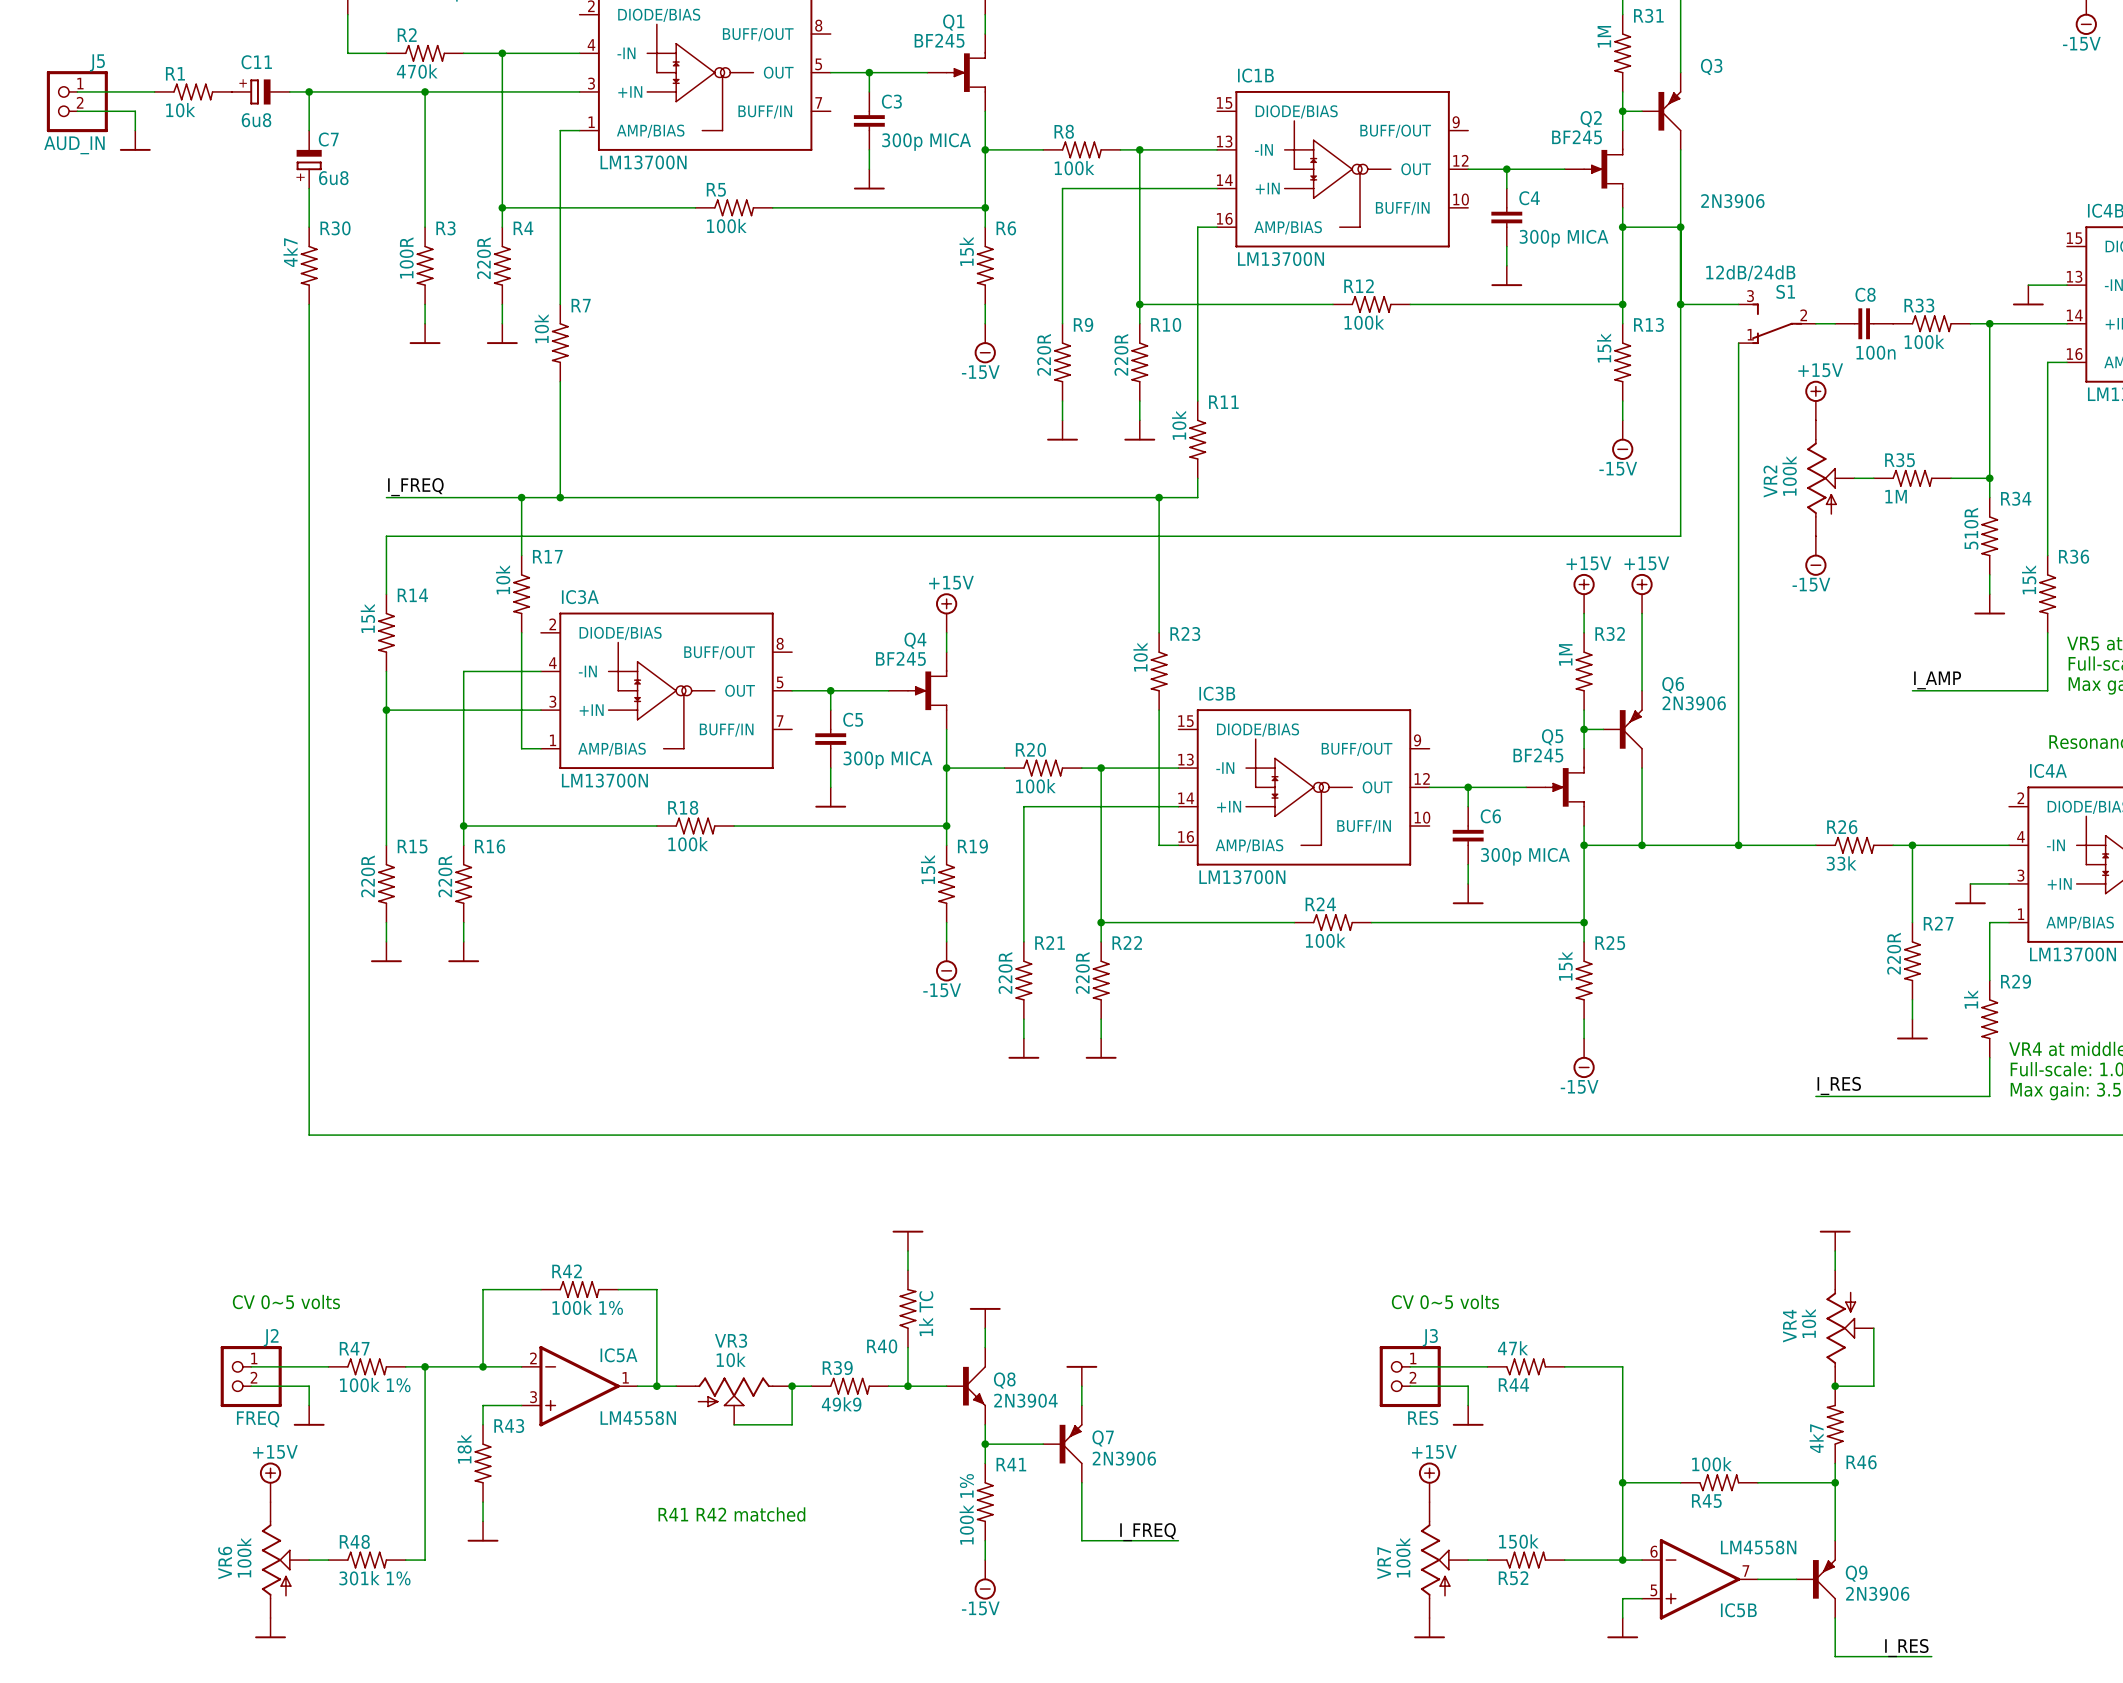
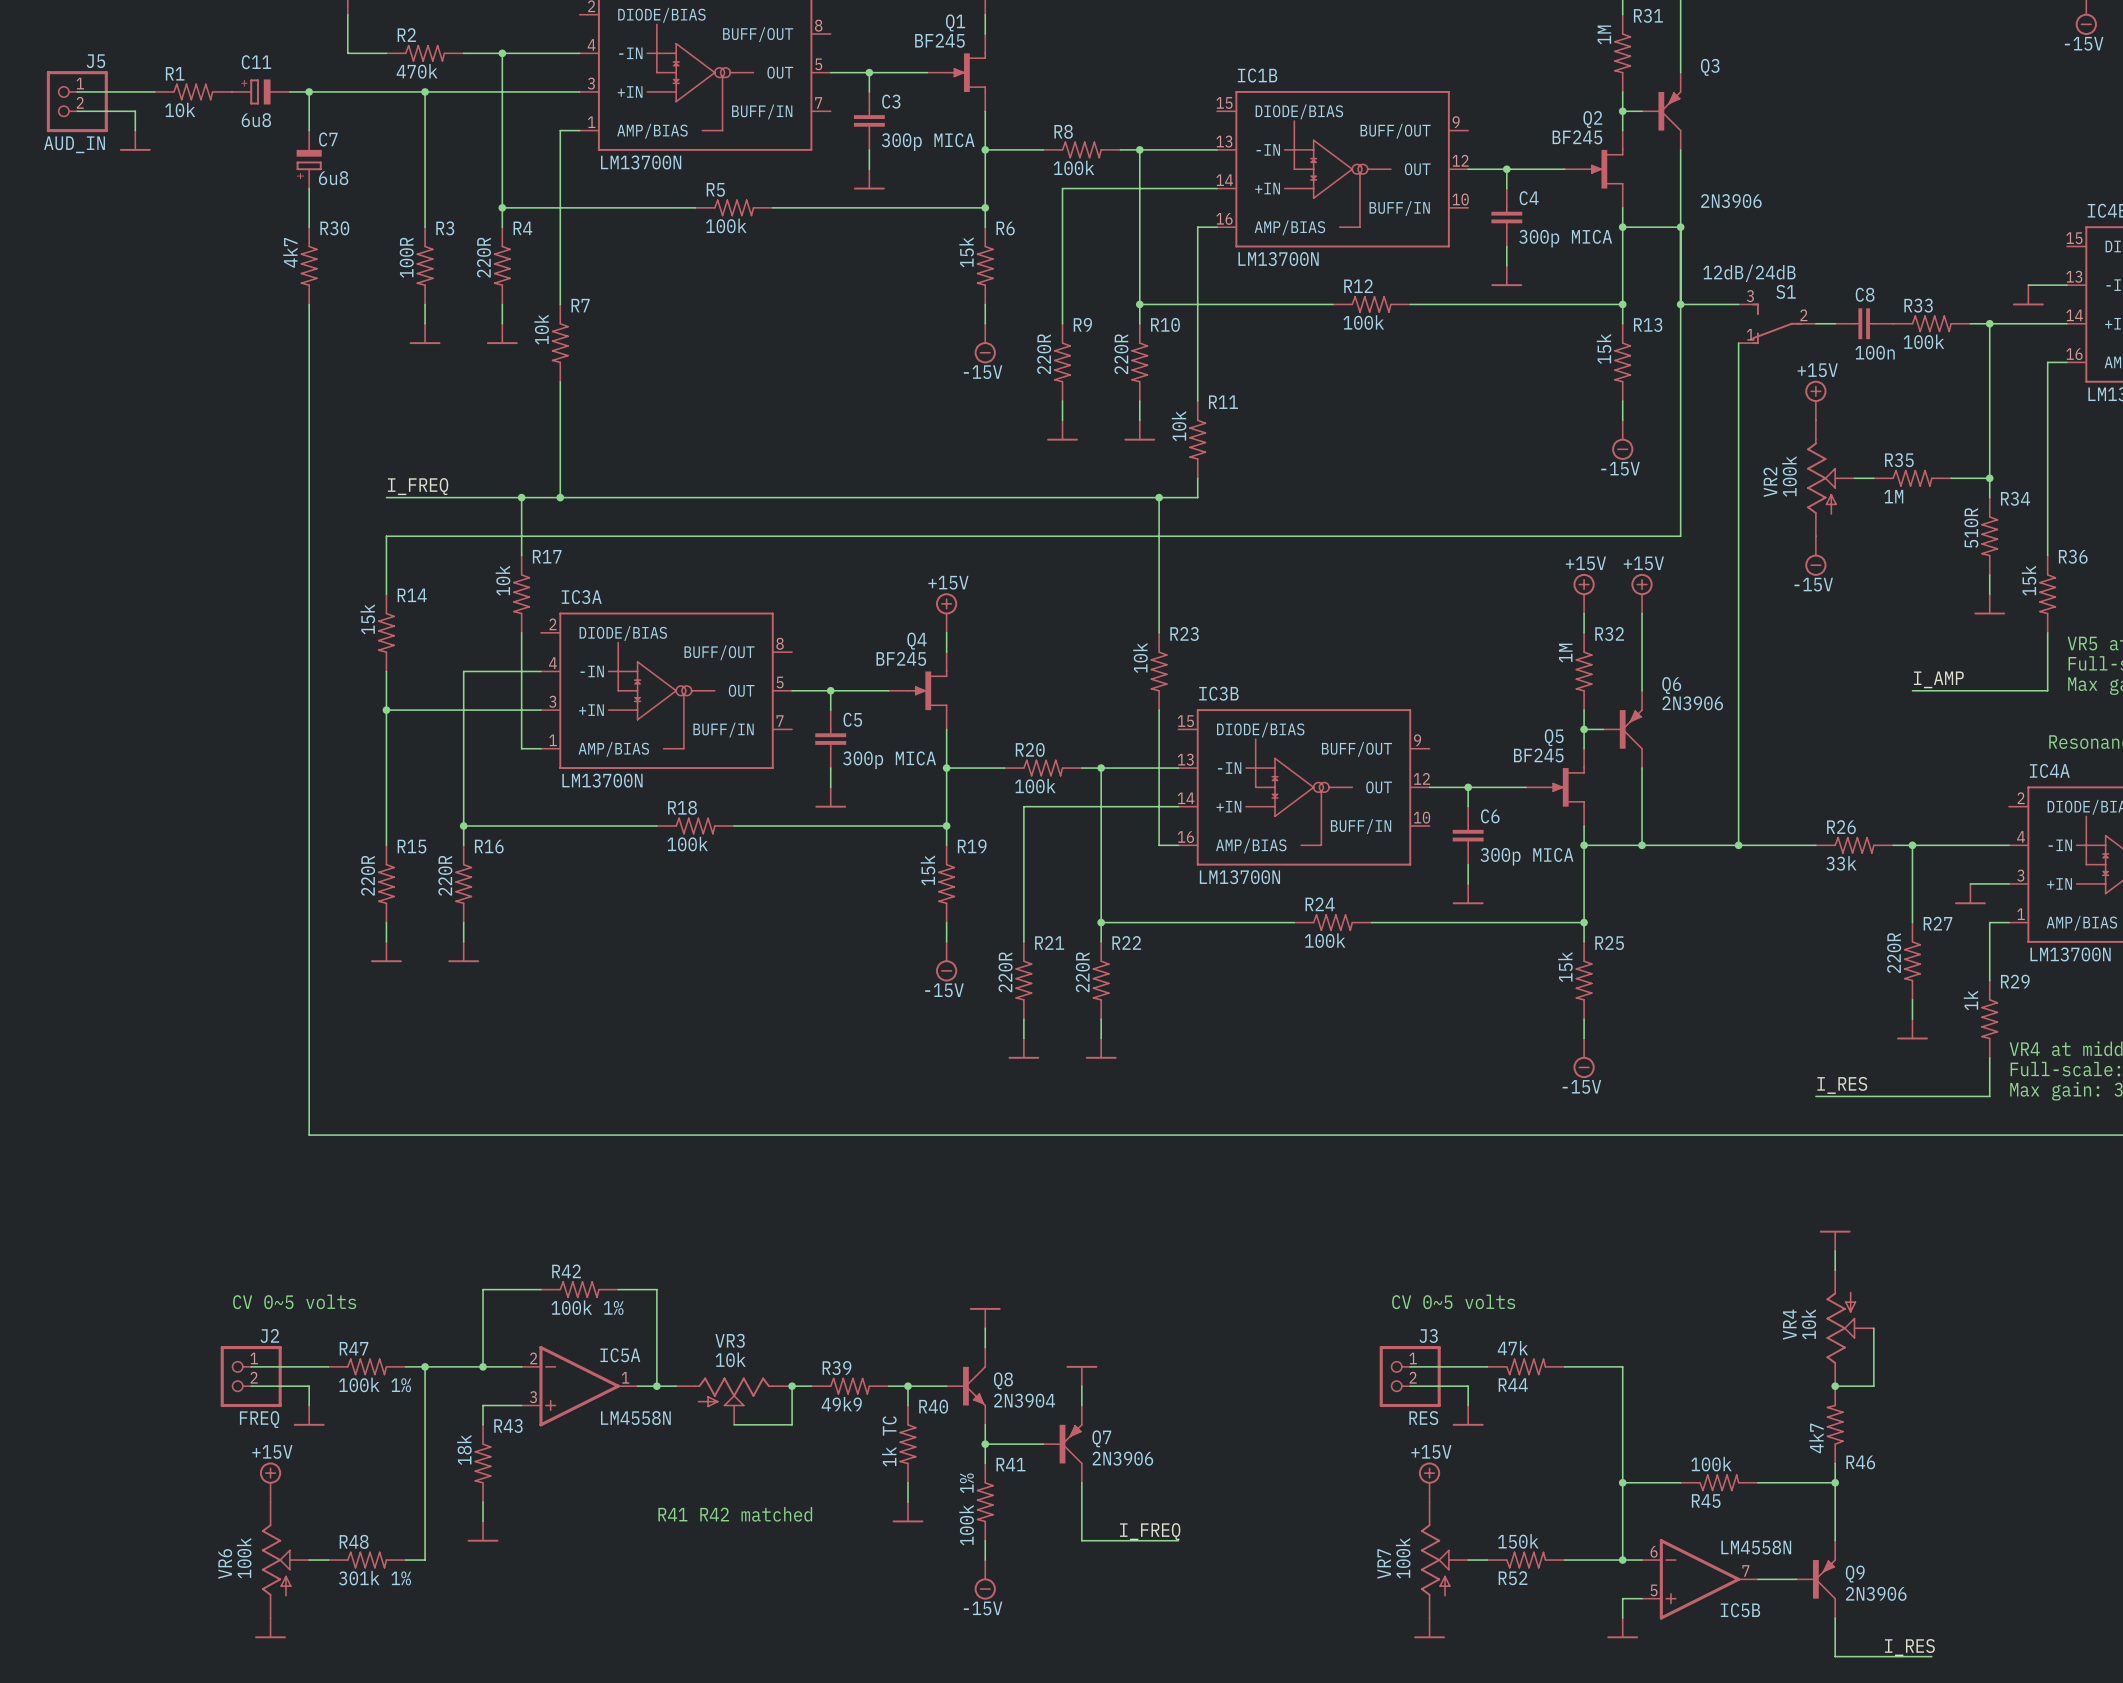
power symbol: (907, 1240) -> none
wire: (907, 1250) (907, 1270) -> none
R40 rotation: 0° (907, 1308) -> 180° (907, 1444)
R40 position: (907, 1308) -> (907, 1444)
wire: (907, 1347) (907, 1386) -> (907, 1405) (907, 1386)
wire: none -> (907, 1482) (907, 1502)
power symbol: none -> (907, 1512)

